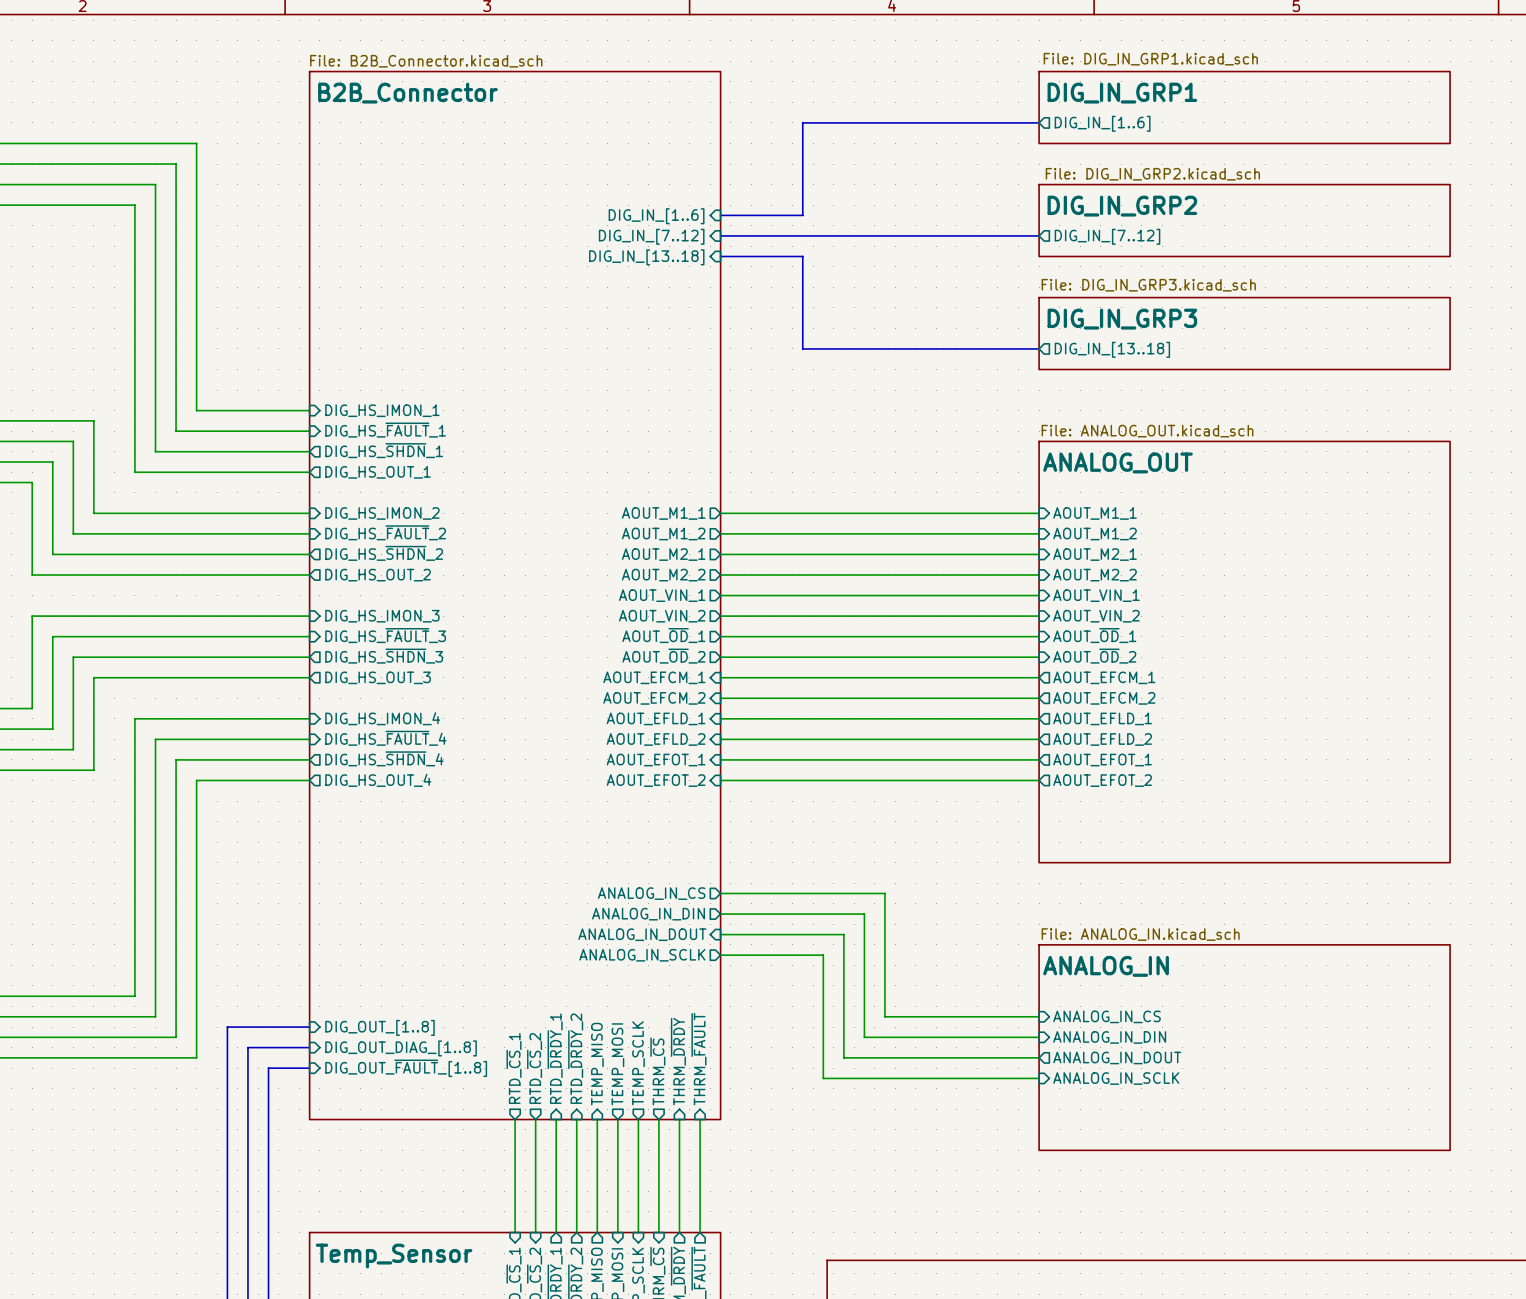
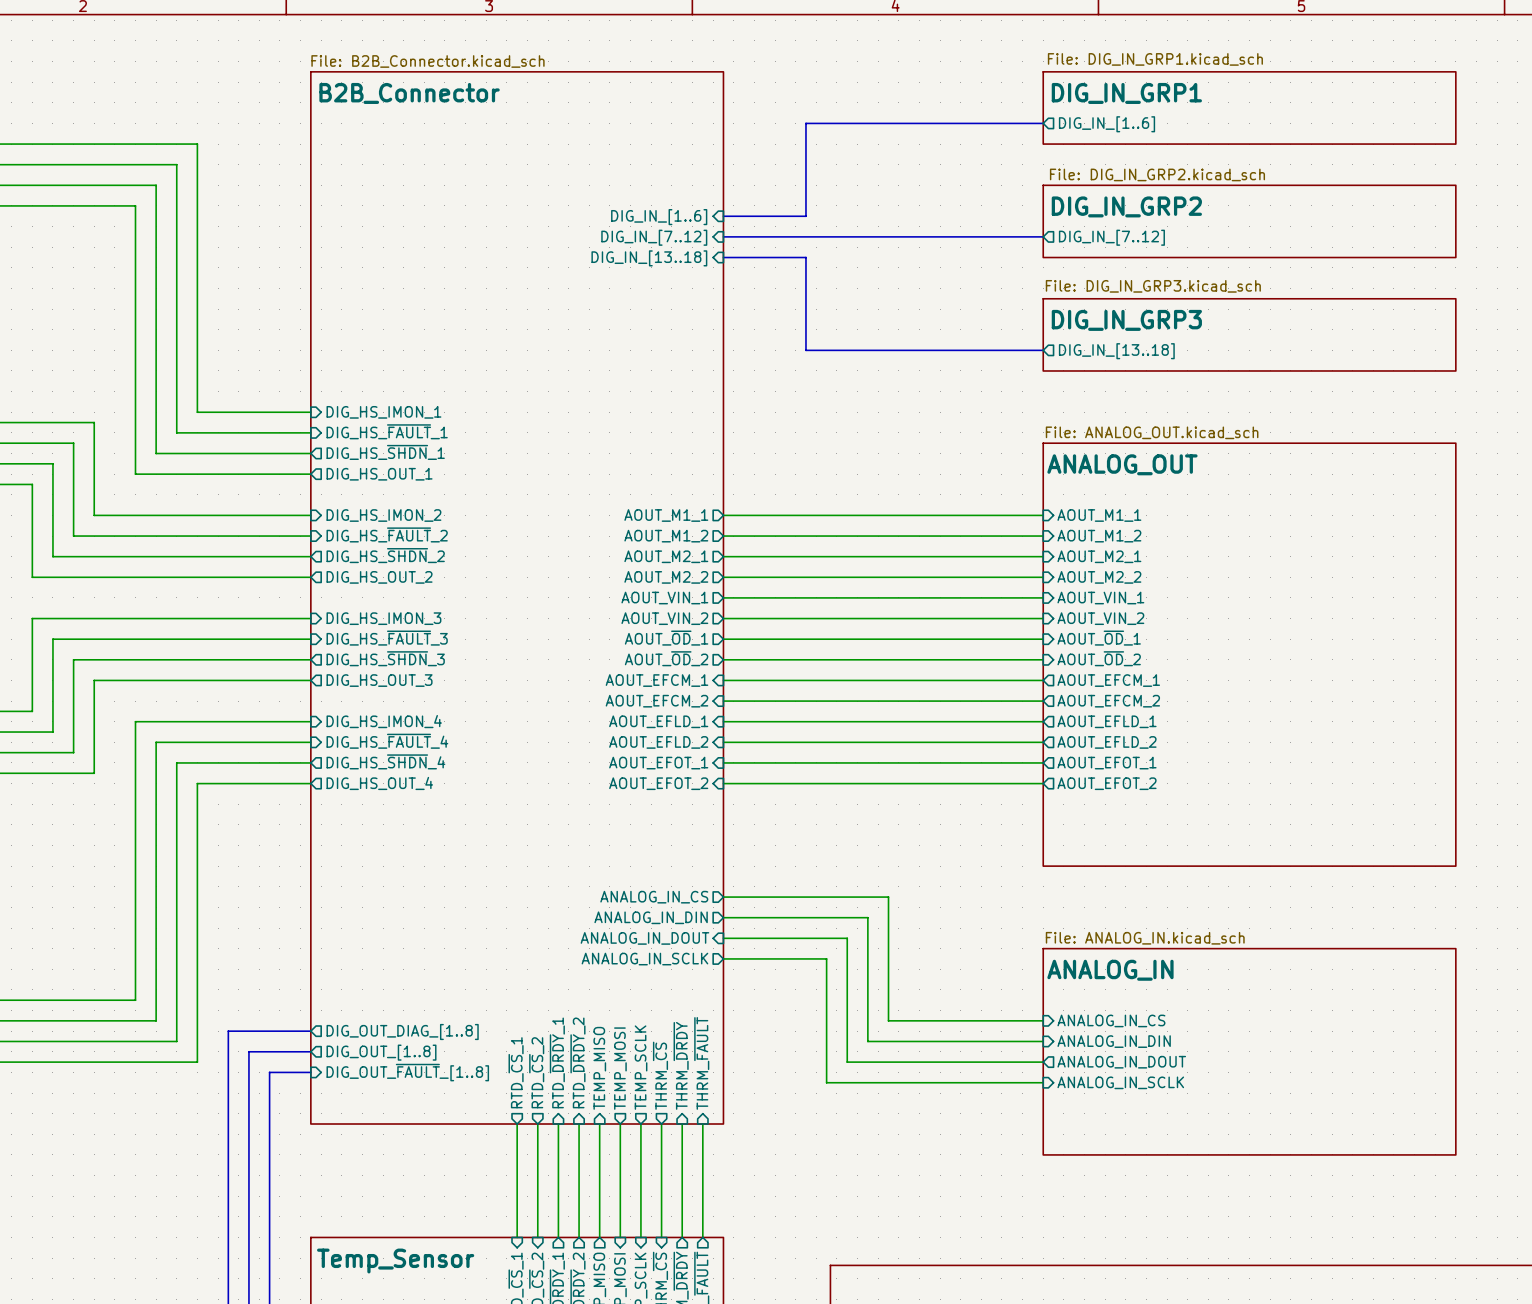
sheet pin shape: input (379, 1027) -> output (402, 1032)
sheet pin: DIG_OUT_[1..8] (379, 1027) -> DIG_OUT_DIAG_[1..8] (402, 1032)
sheet pin shape: input (401, 1048) -> output (381, 1052)
sheet pin: DIG_OUT_DIAG_[1..8] (401, 1048) -> DIG_OUT_[1..8] (381, 1052)

